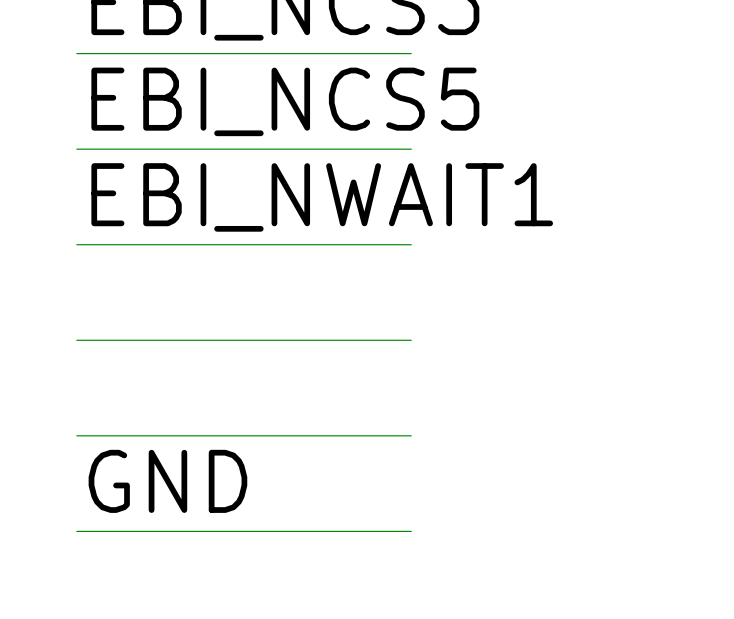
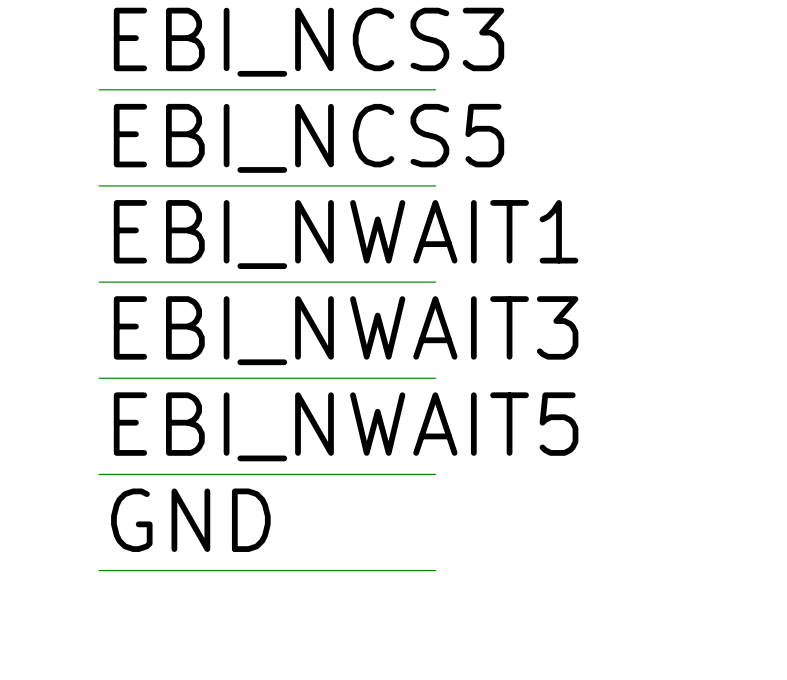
label: none -> EBI_NWAIT3 (346, 330)
label: none -> EBI_NWAIT5 (346, 426)

